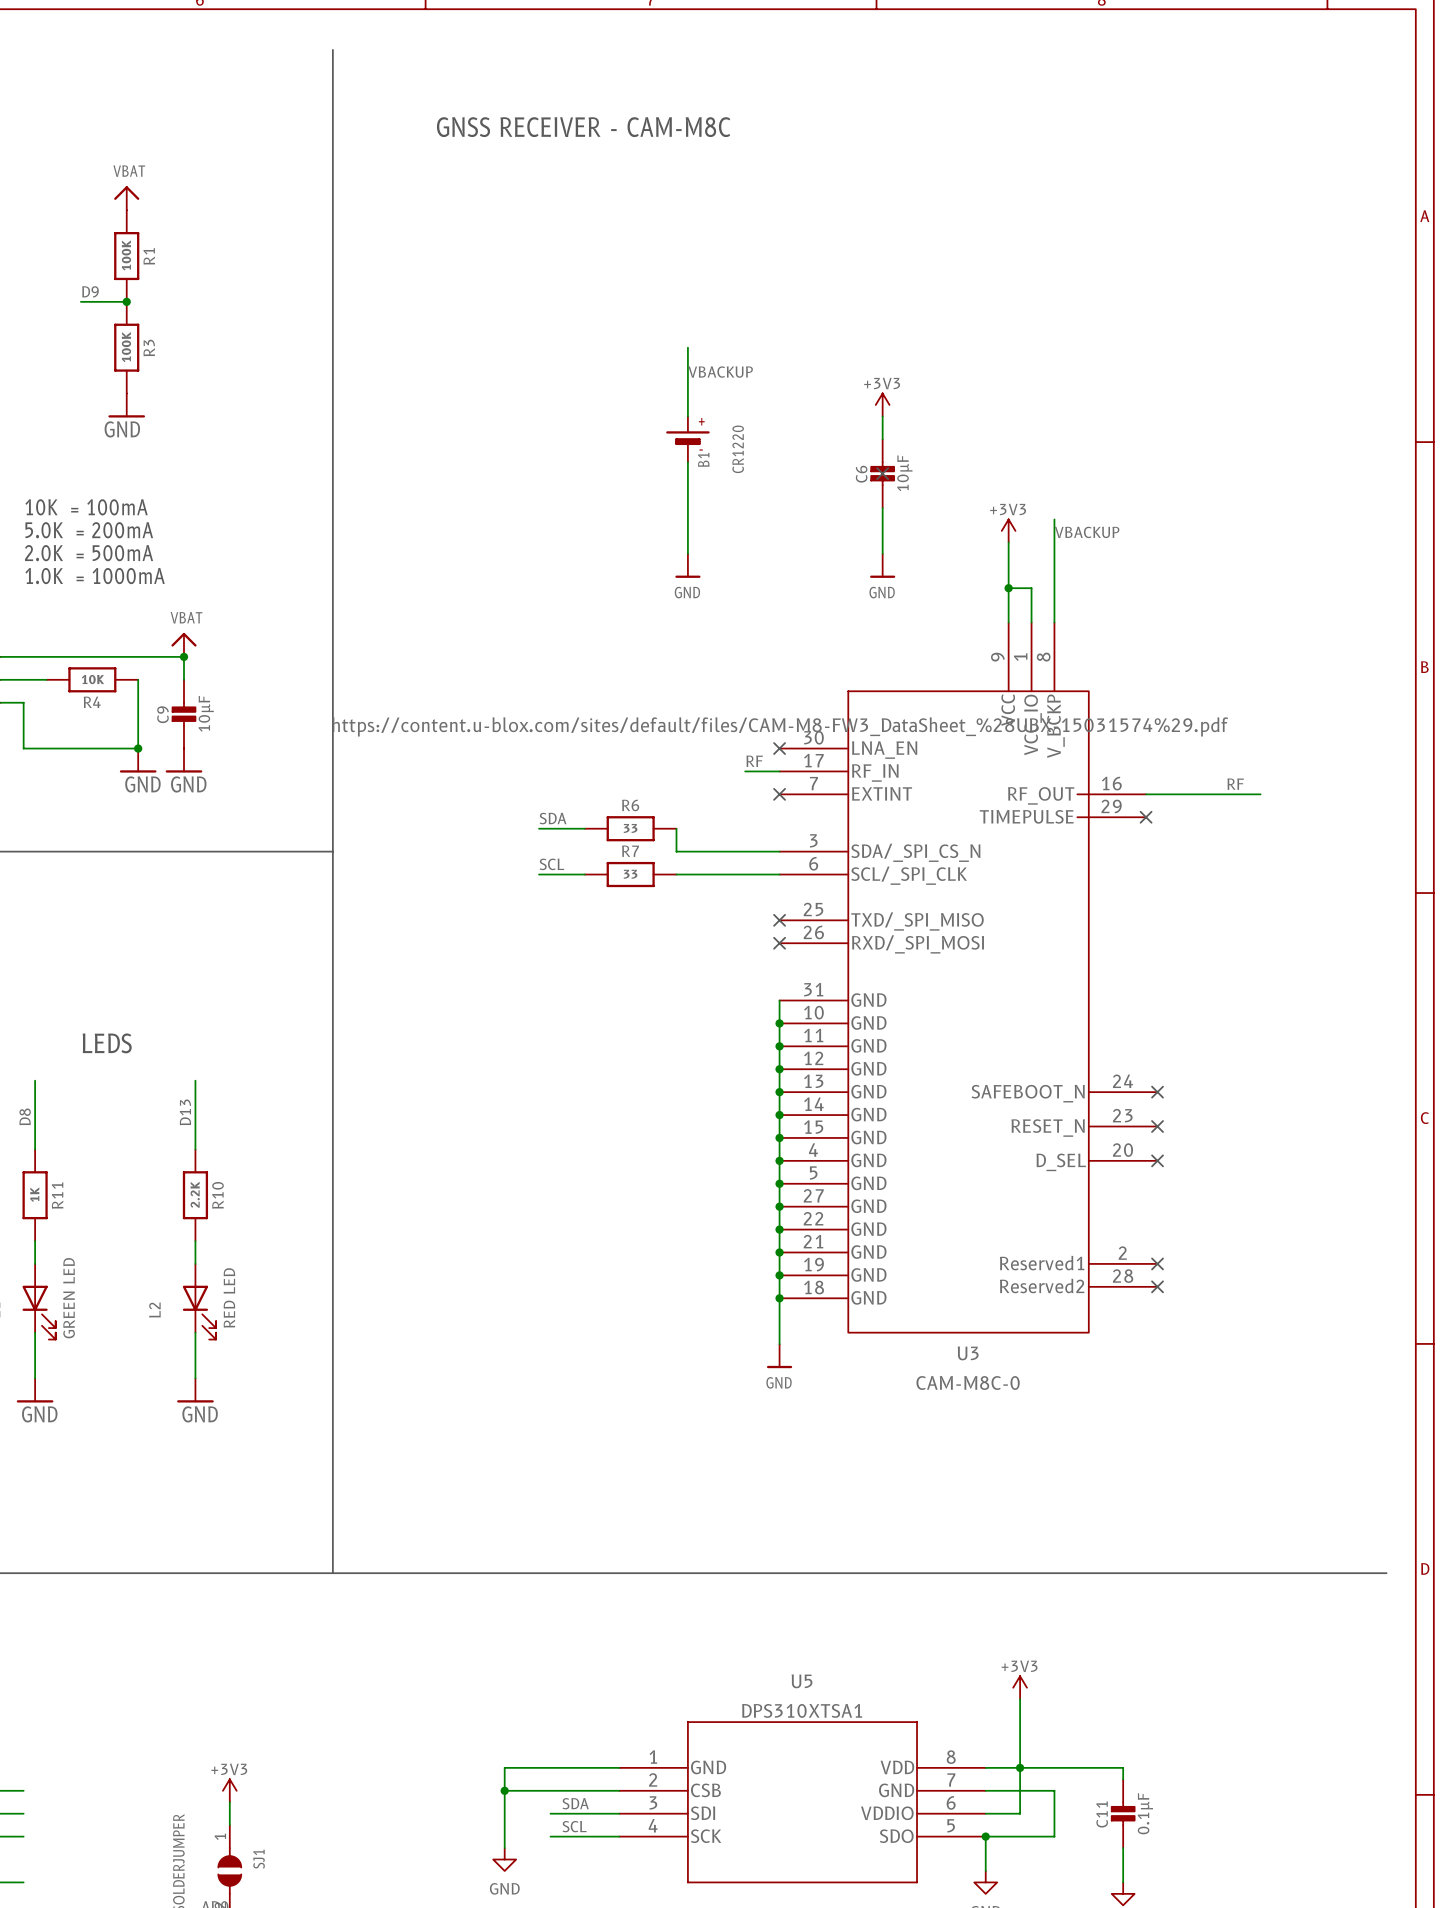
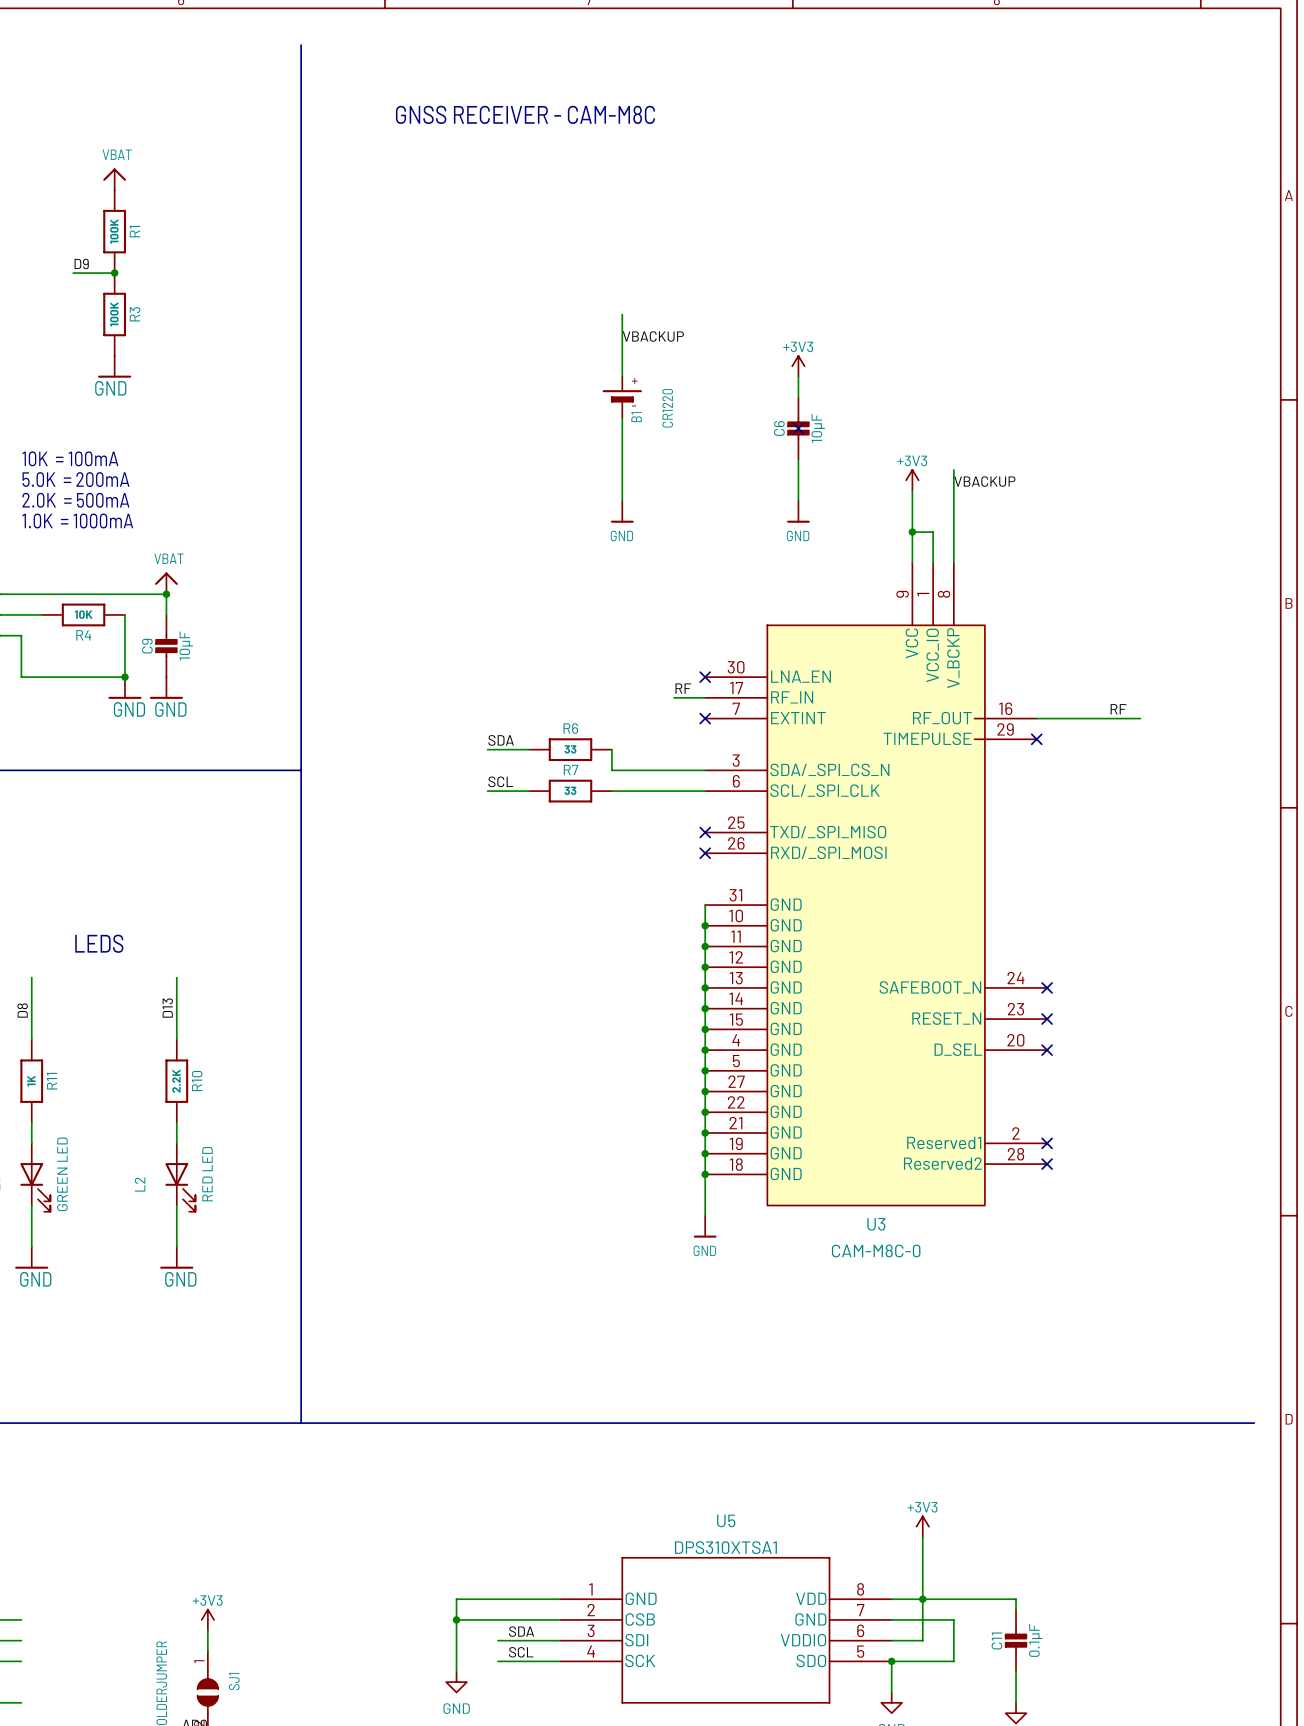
U3 text: https://content.u-blox.com/sites/default/files/CAM-M8-FW3_DataSheet_%28UBX-15031574%29.pdf (780, 726) -> none

